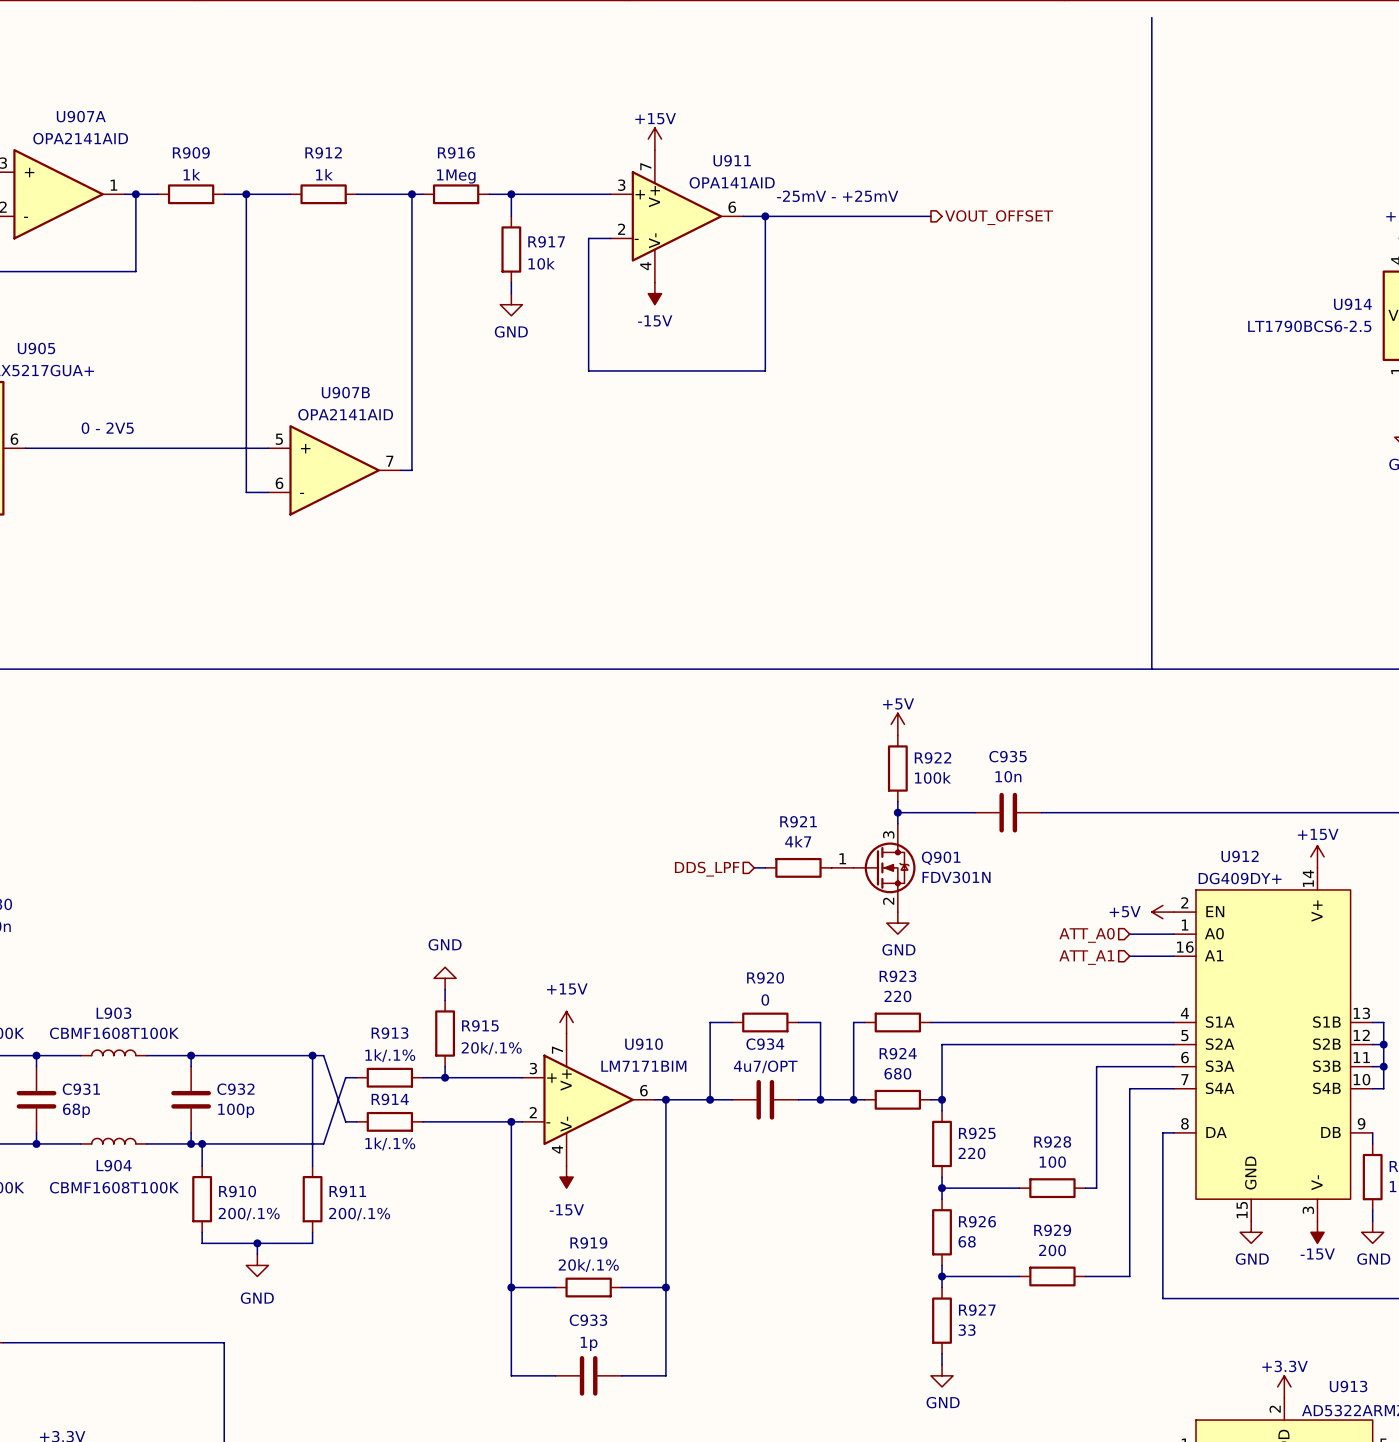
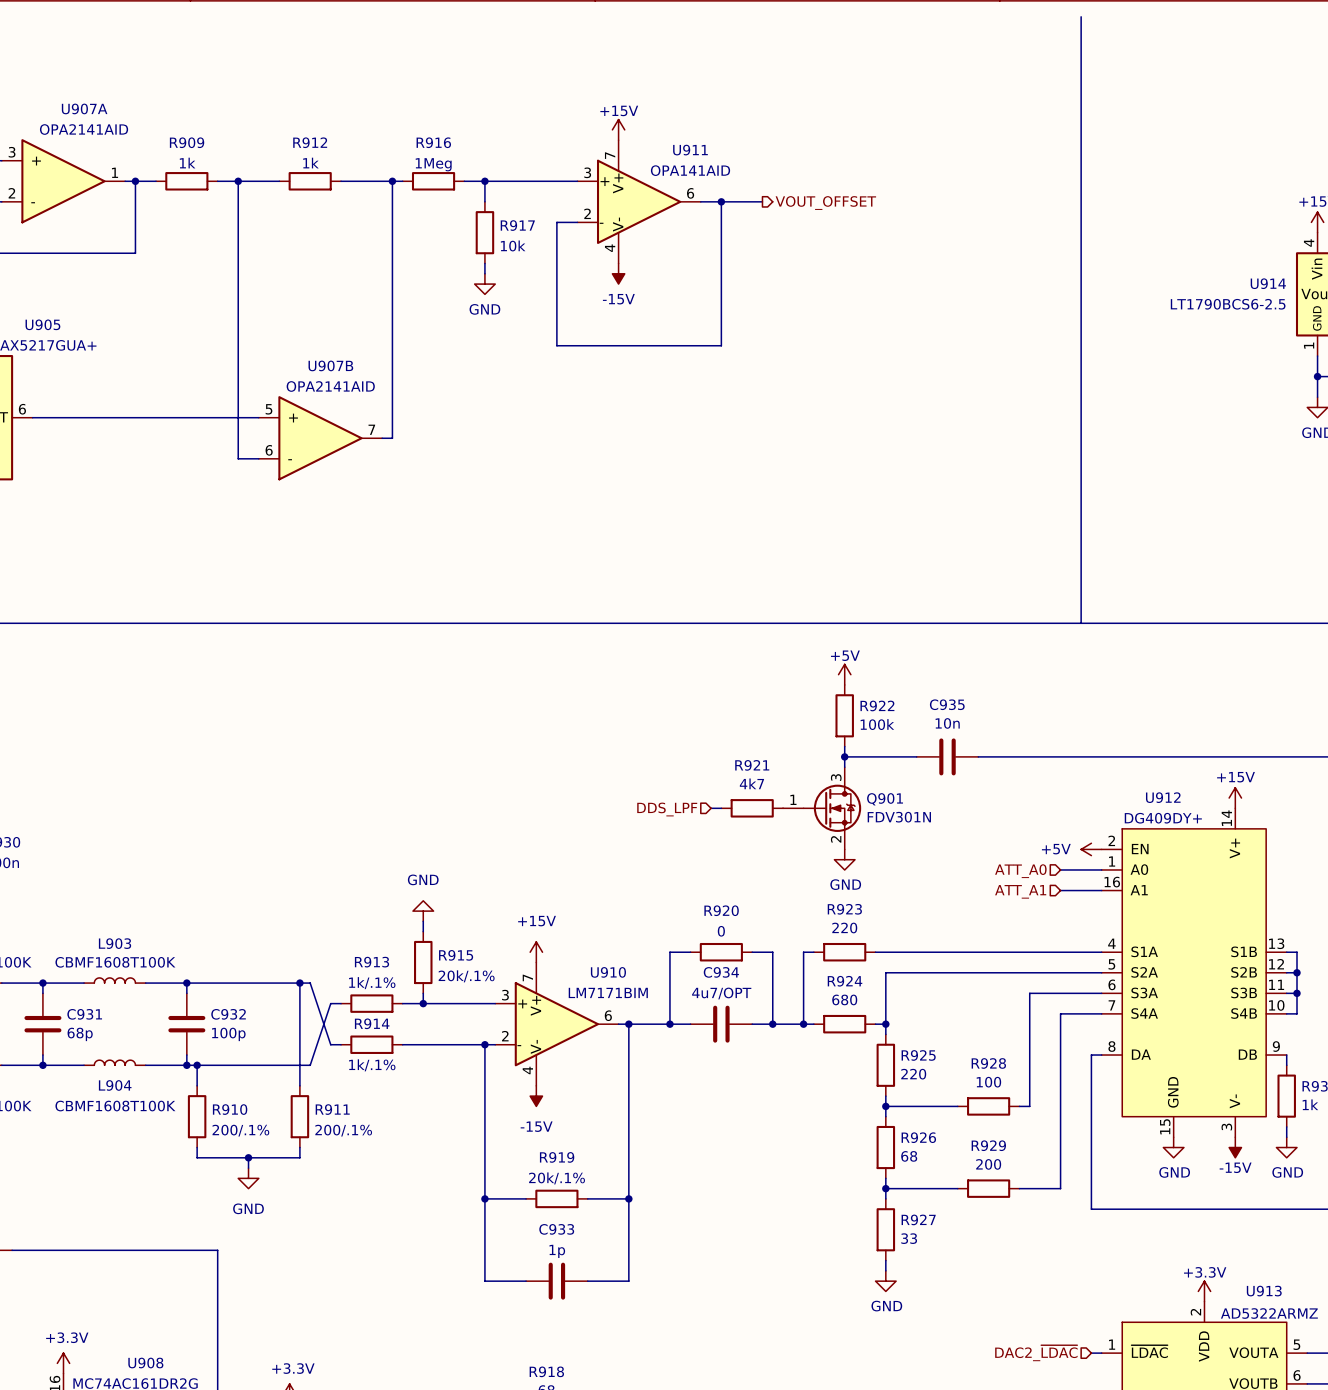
text: -25mV - +25mV (837, 196) -> none
wire: (809, 216) (930, 216) -> none
hierarchical label position: VOUT_OFFSET (999, 217) -> VOUT_OFFSET (825, 203)
text: 0 - 2V5 (107, 428) -> none

